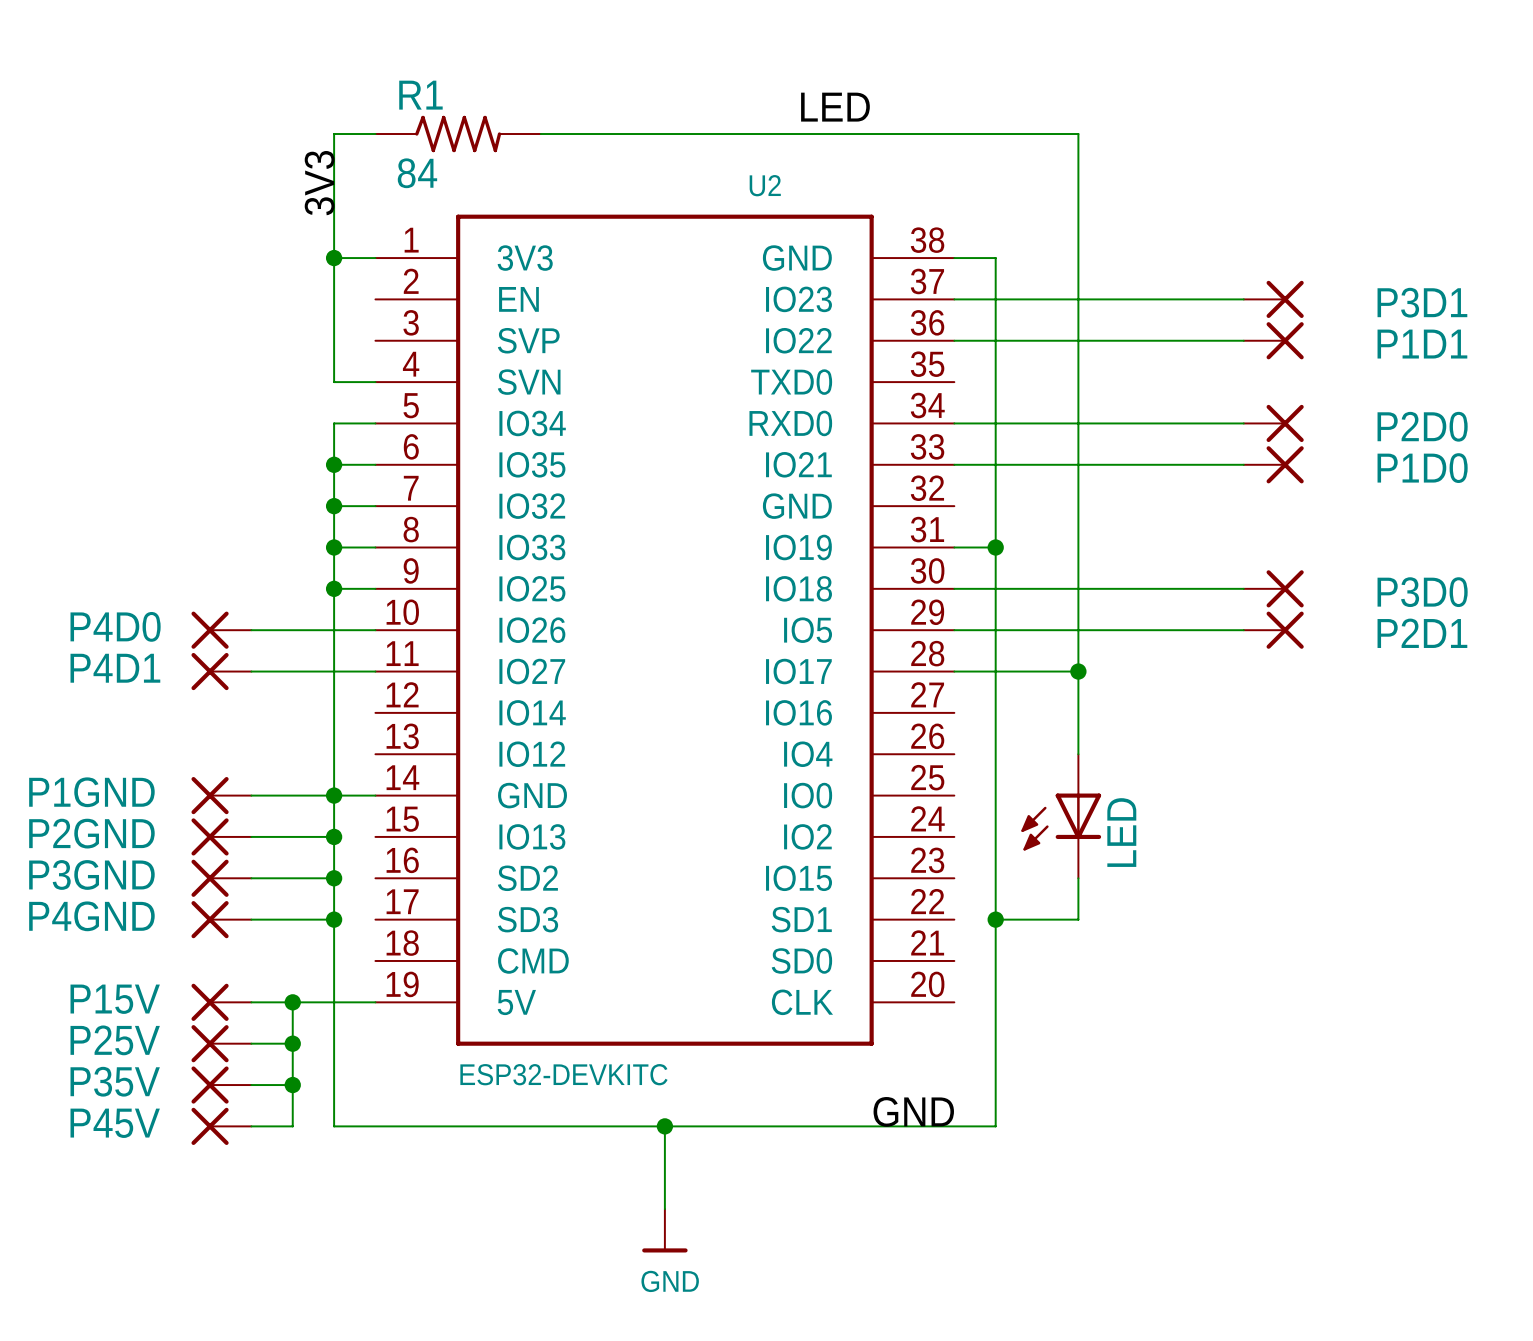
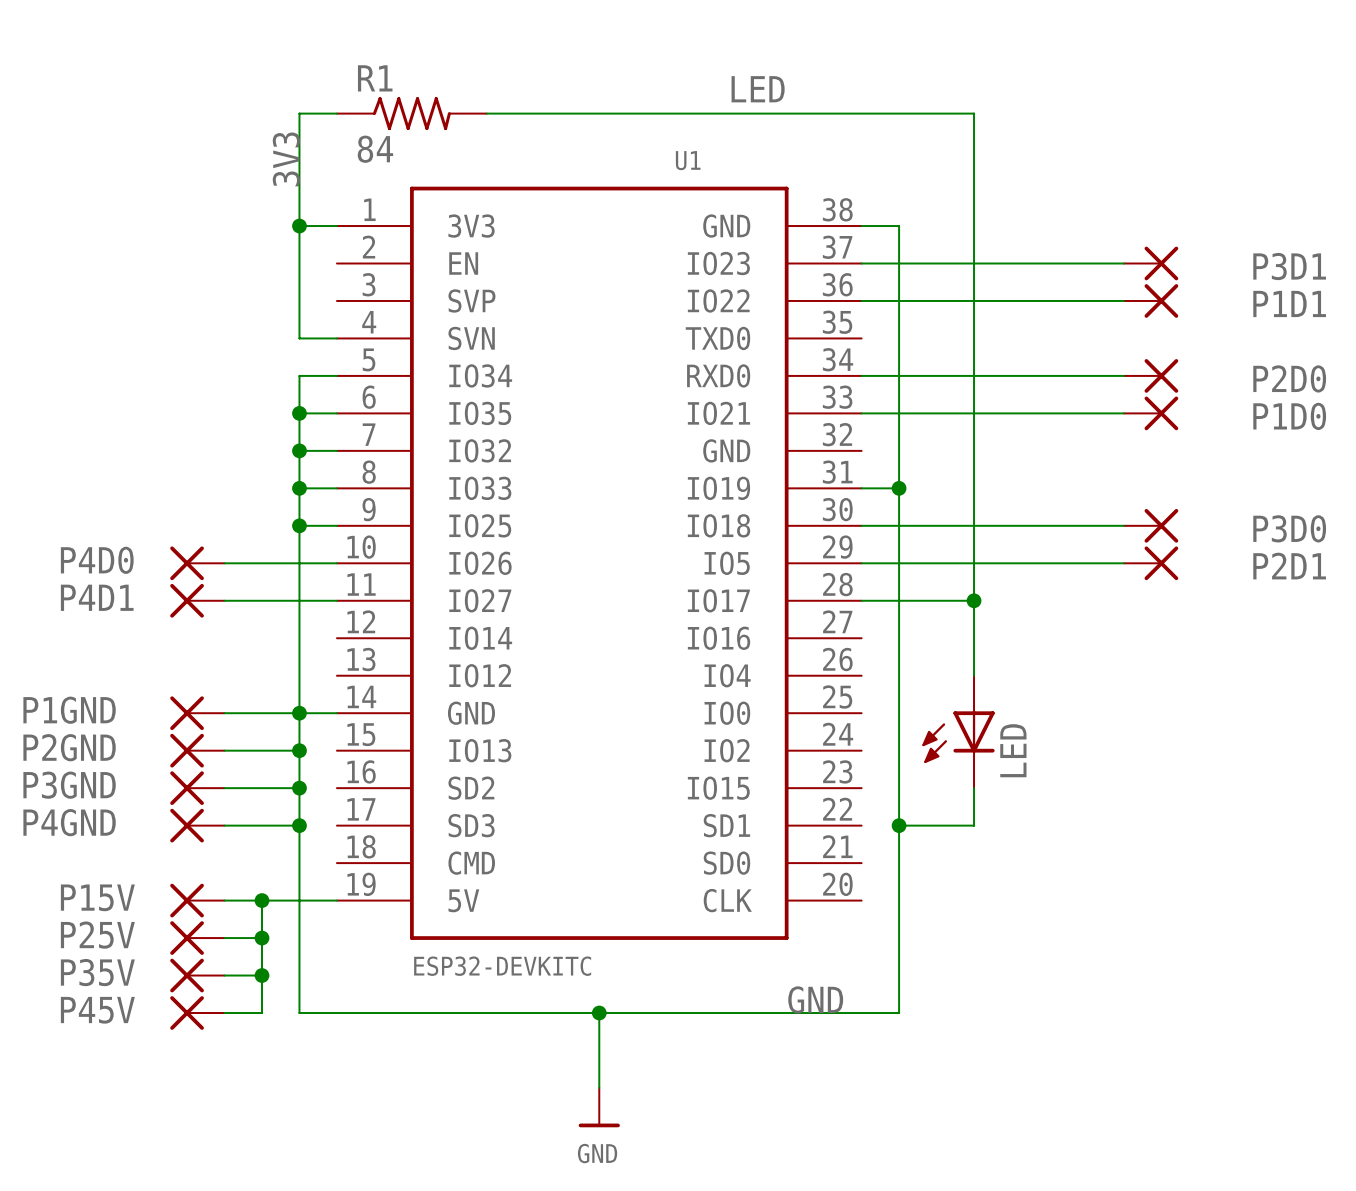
U2 name: U2 (765, 185) -> U1 (688, 160)

